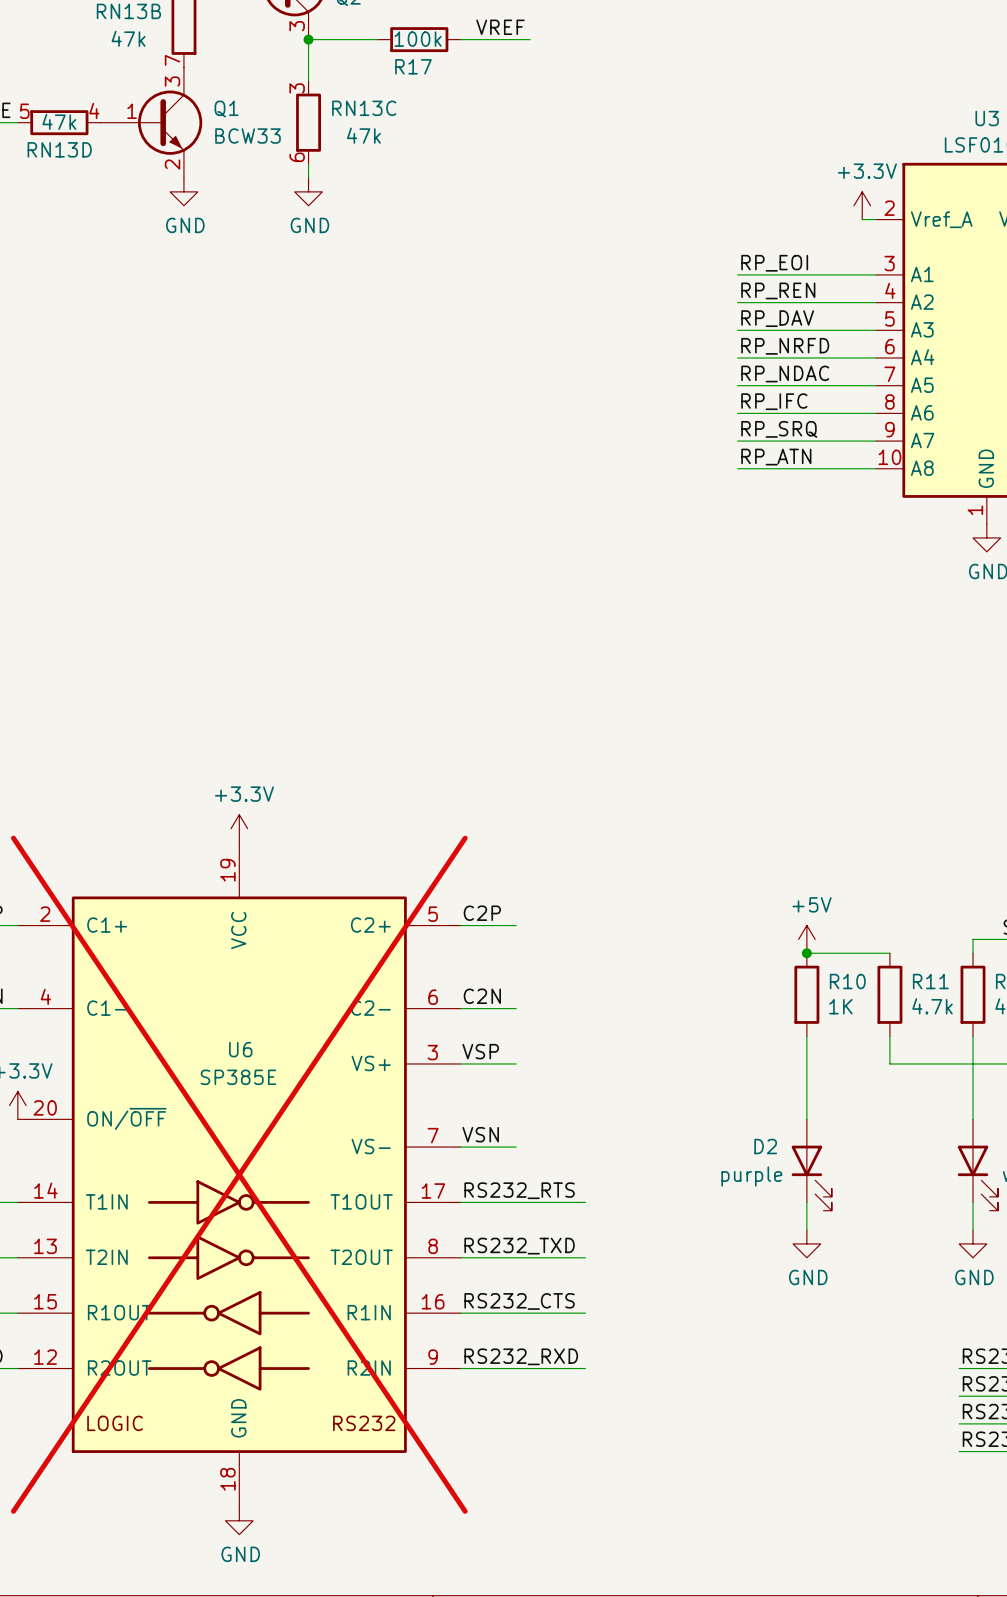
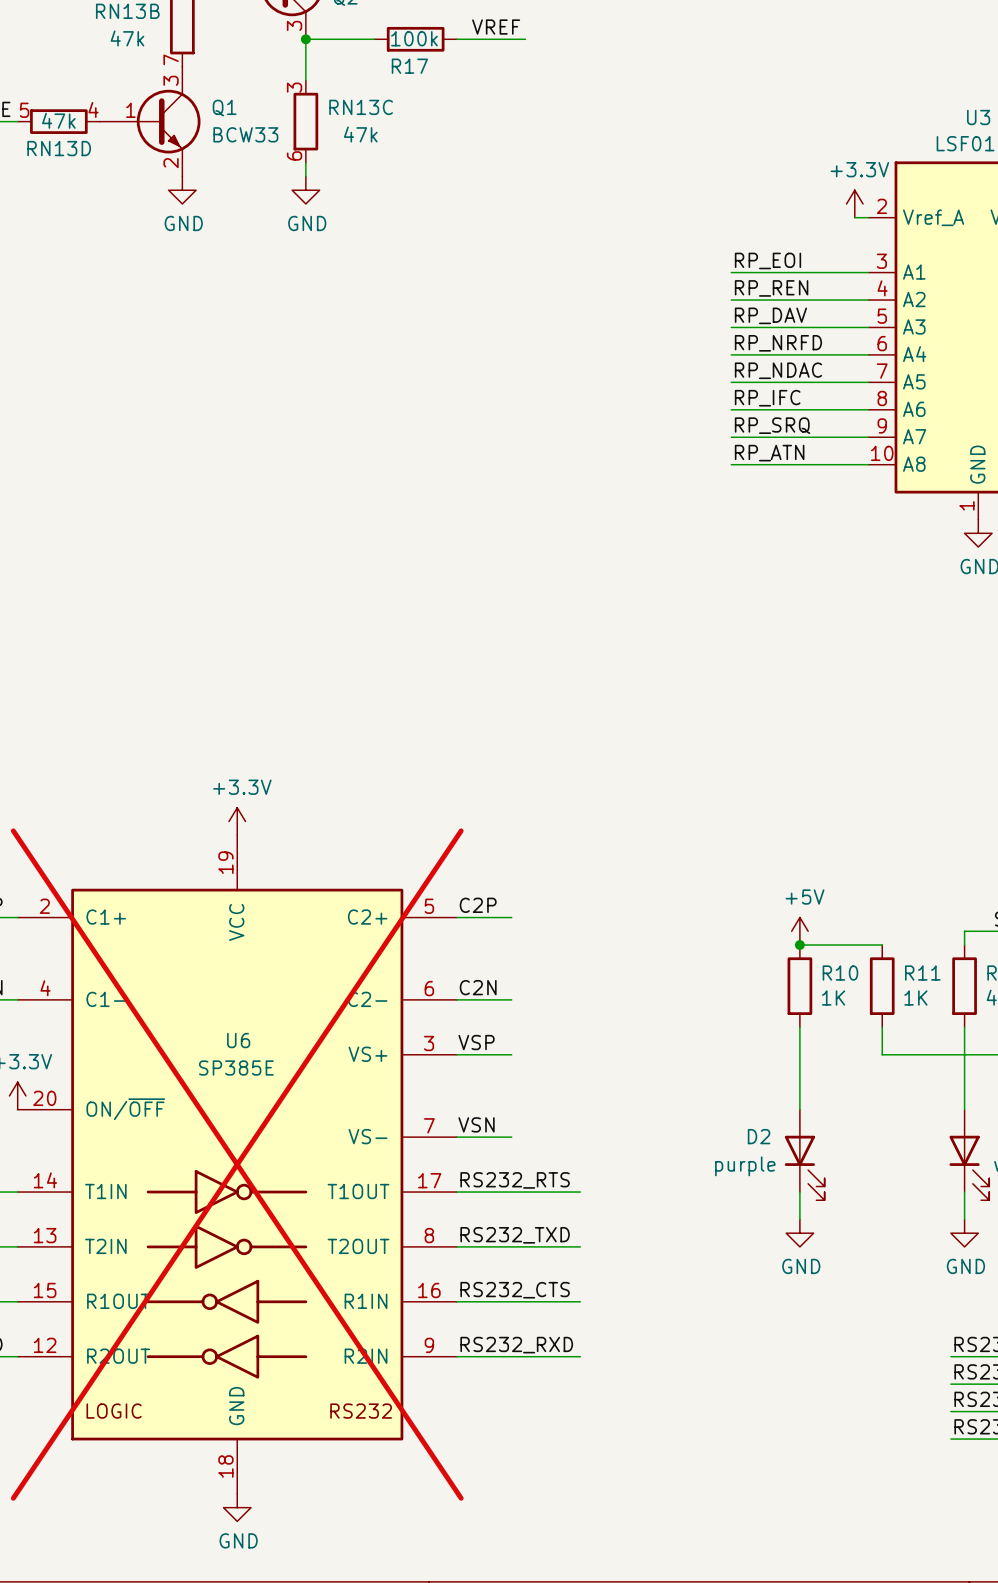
R11 value: 4.7k (932, 1006) -> 1K (915, 998)

